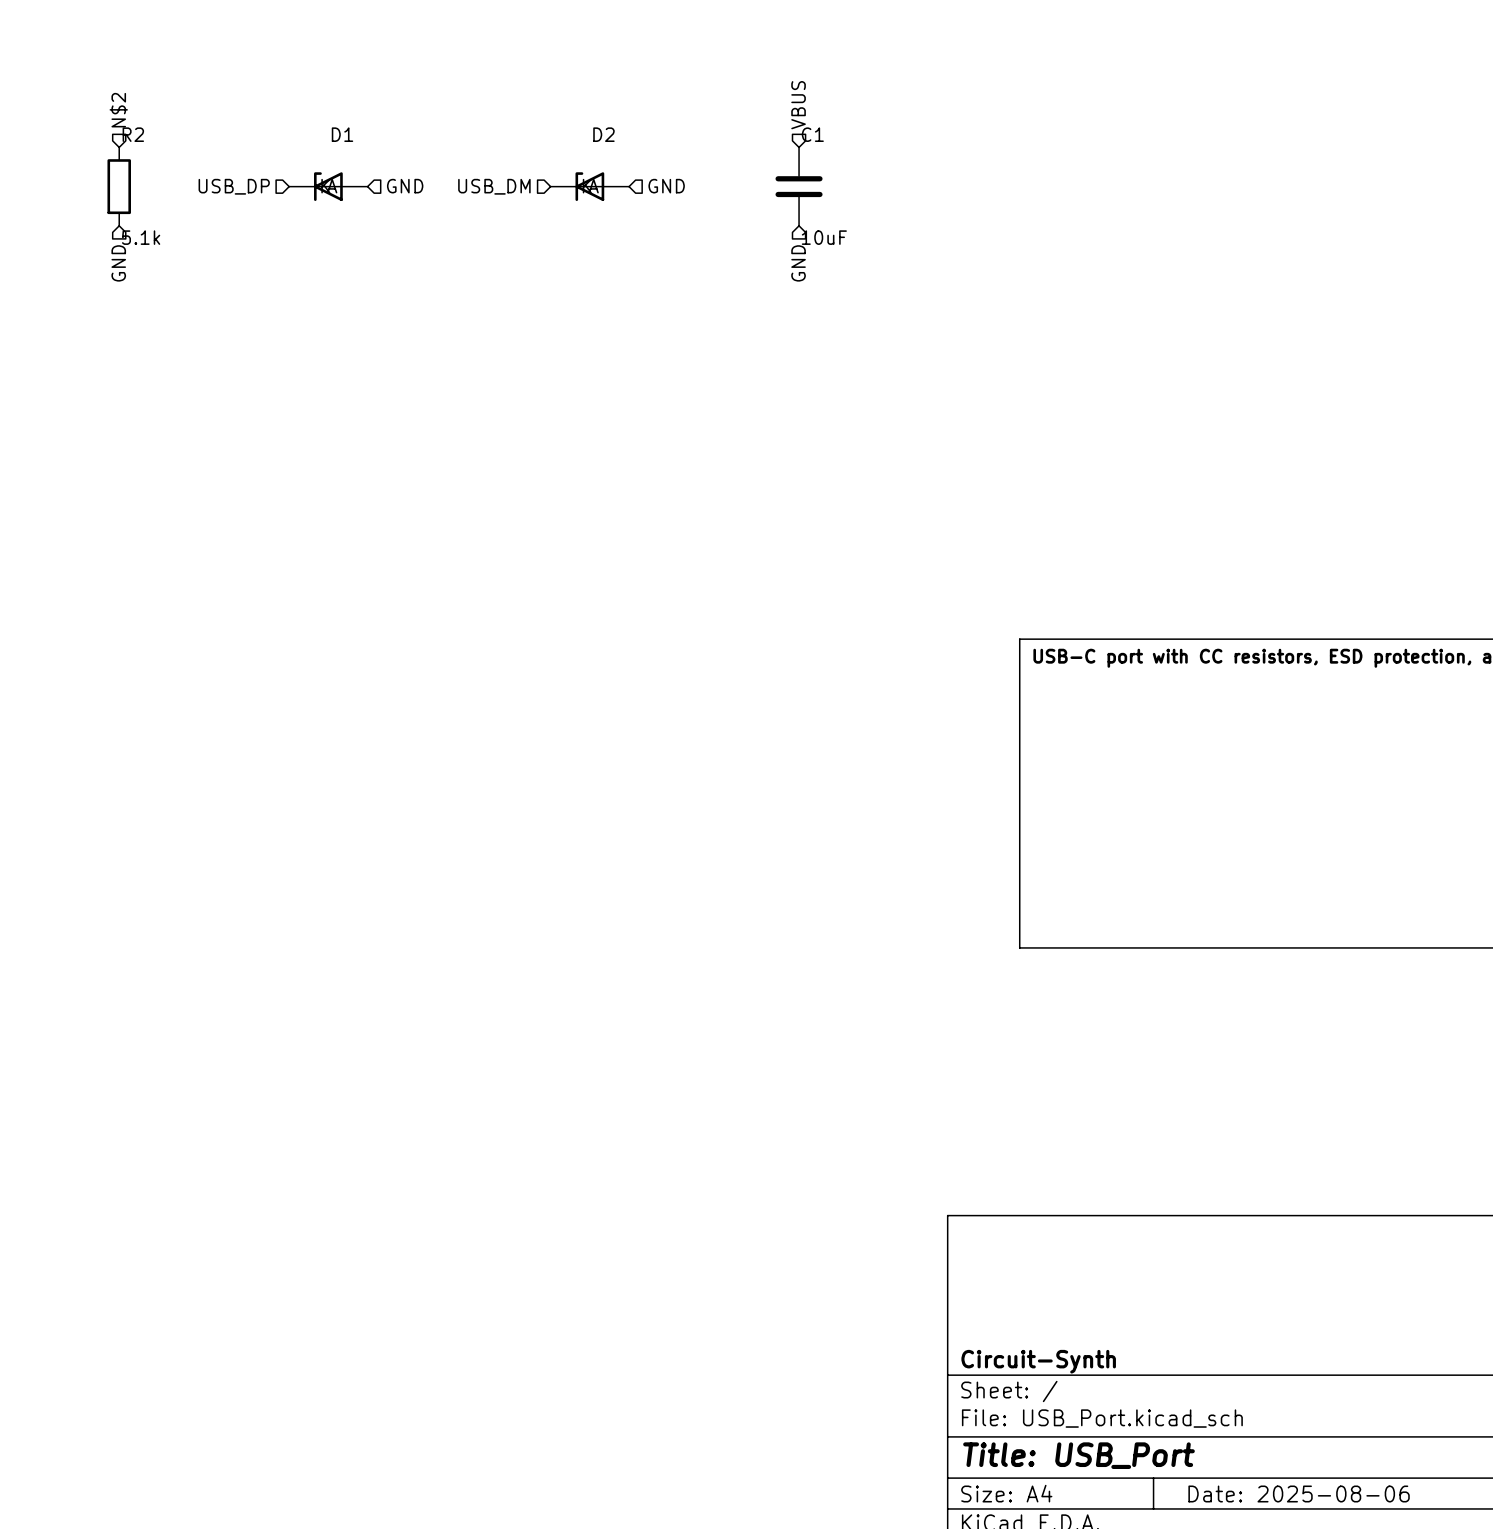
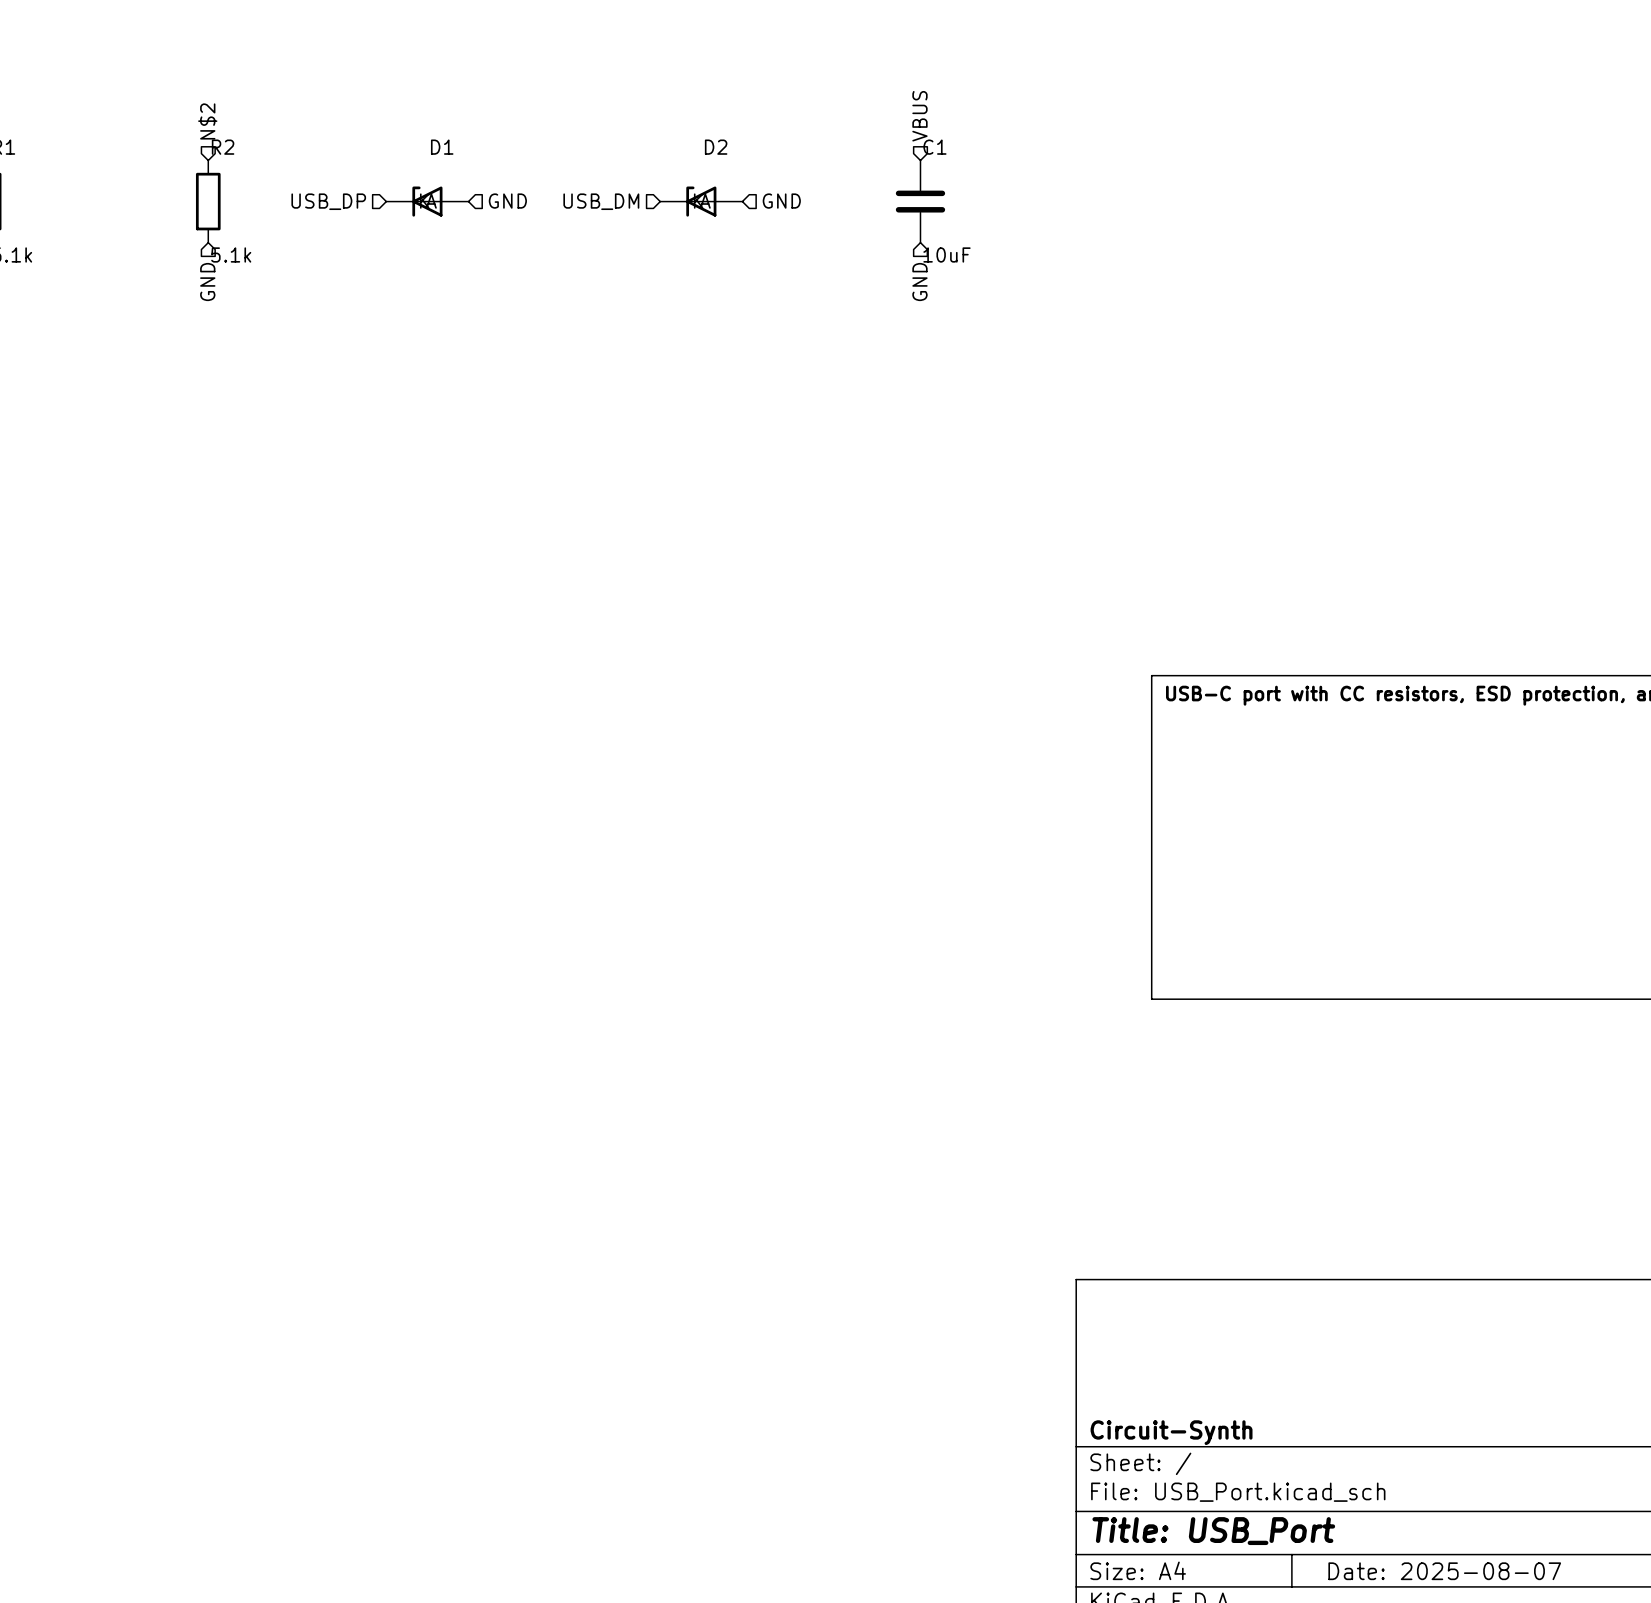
title block: Date: 2025-08-06 (1299, 1493) -> Date: 2025-08-07 (1444, 1571)

